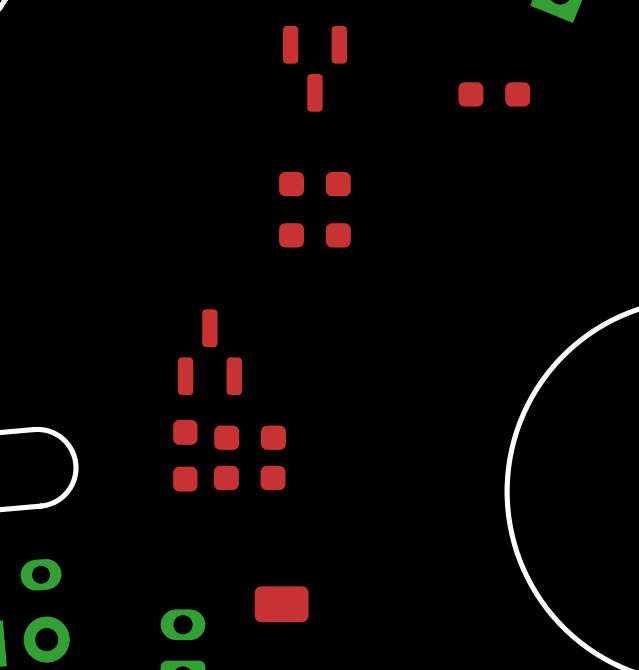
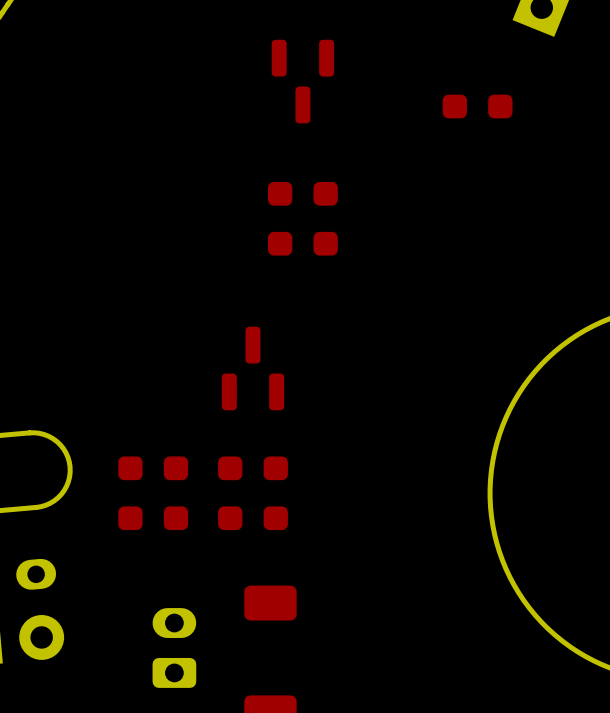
part position: (209, 352) -> (253, 368)
part: (250, 437) -> none
part rotation: 0° (185, 455) -> 90° clockwise (153, 468)
part: none -> (253, 468)
part: (249, 477) -> none
part: none -> (153, 518)
part: none -> (253, 518)

